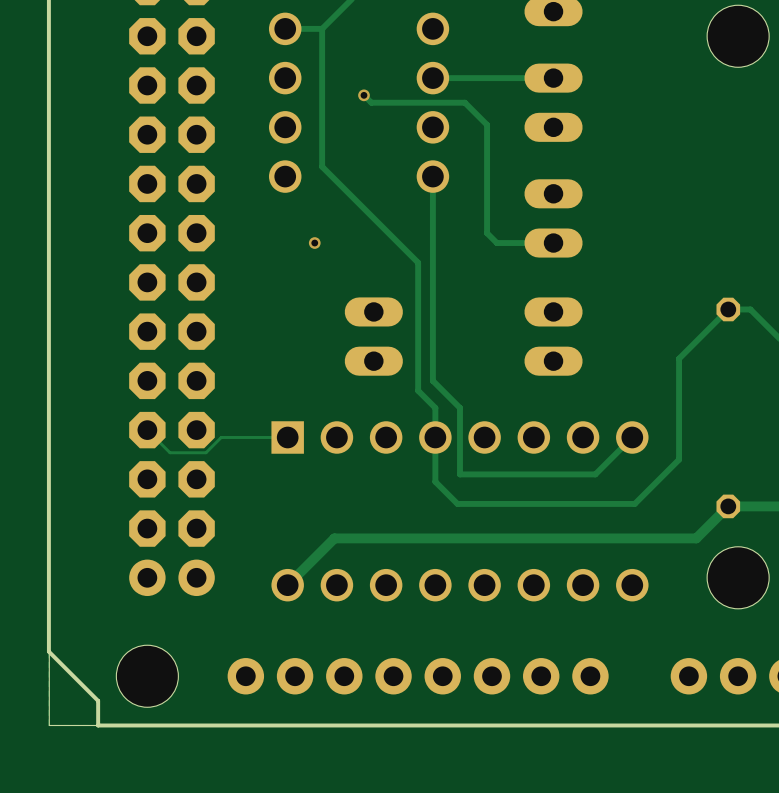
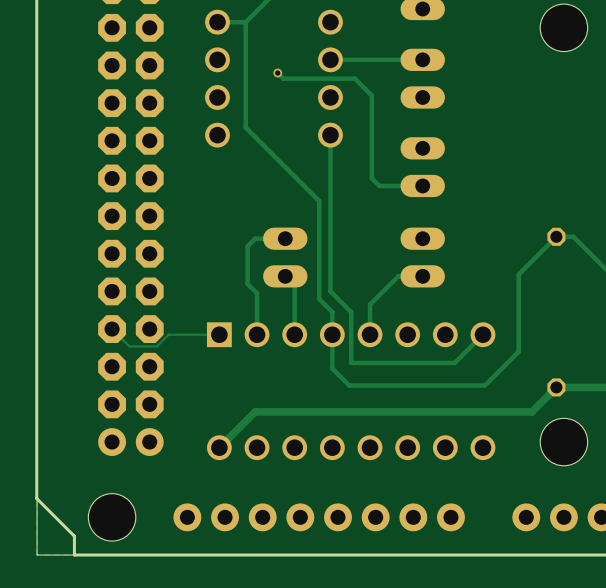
via: (314, 243) -> none
track: none -> (285, 238) (255, 238) (247, 246) (247, 283) (257, 293) (257, 334)
track: none -> (285, 276) (294, 285) (294, 334)
track: none -> (422, 276) (398, 276) (370, 304) (370, 334)

